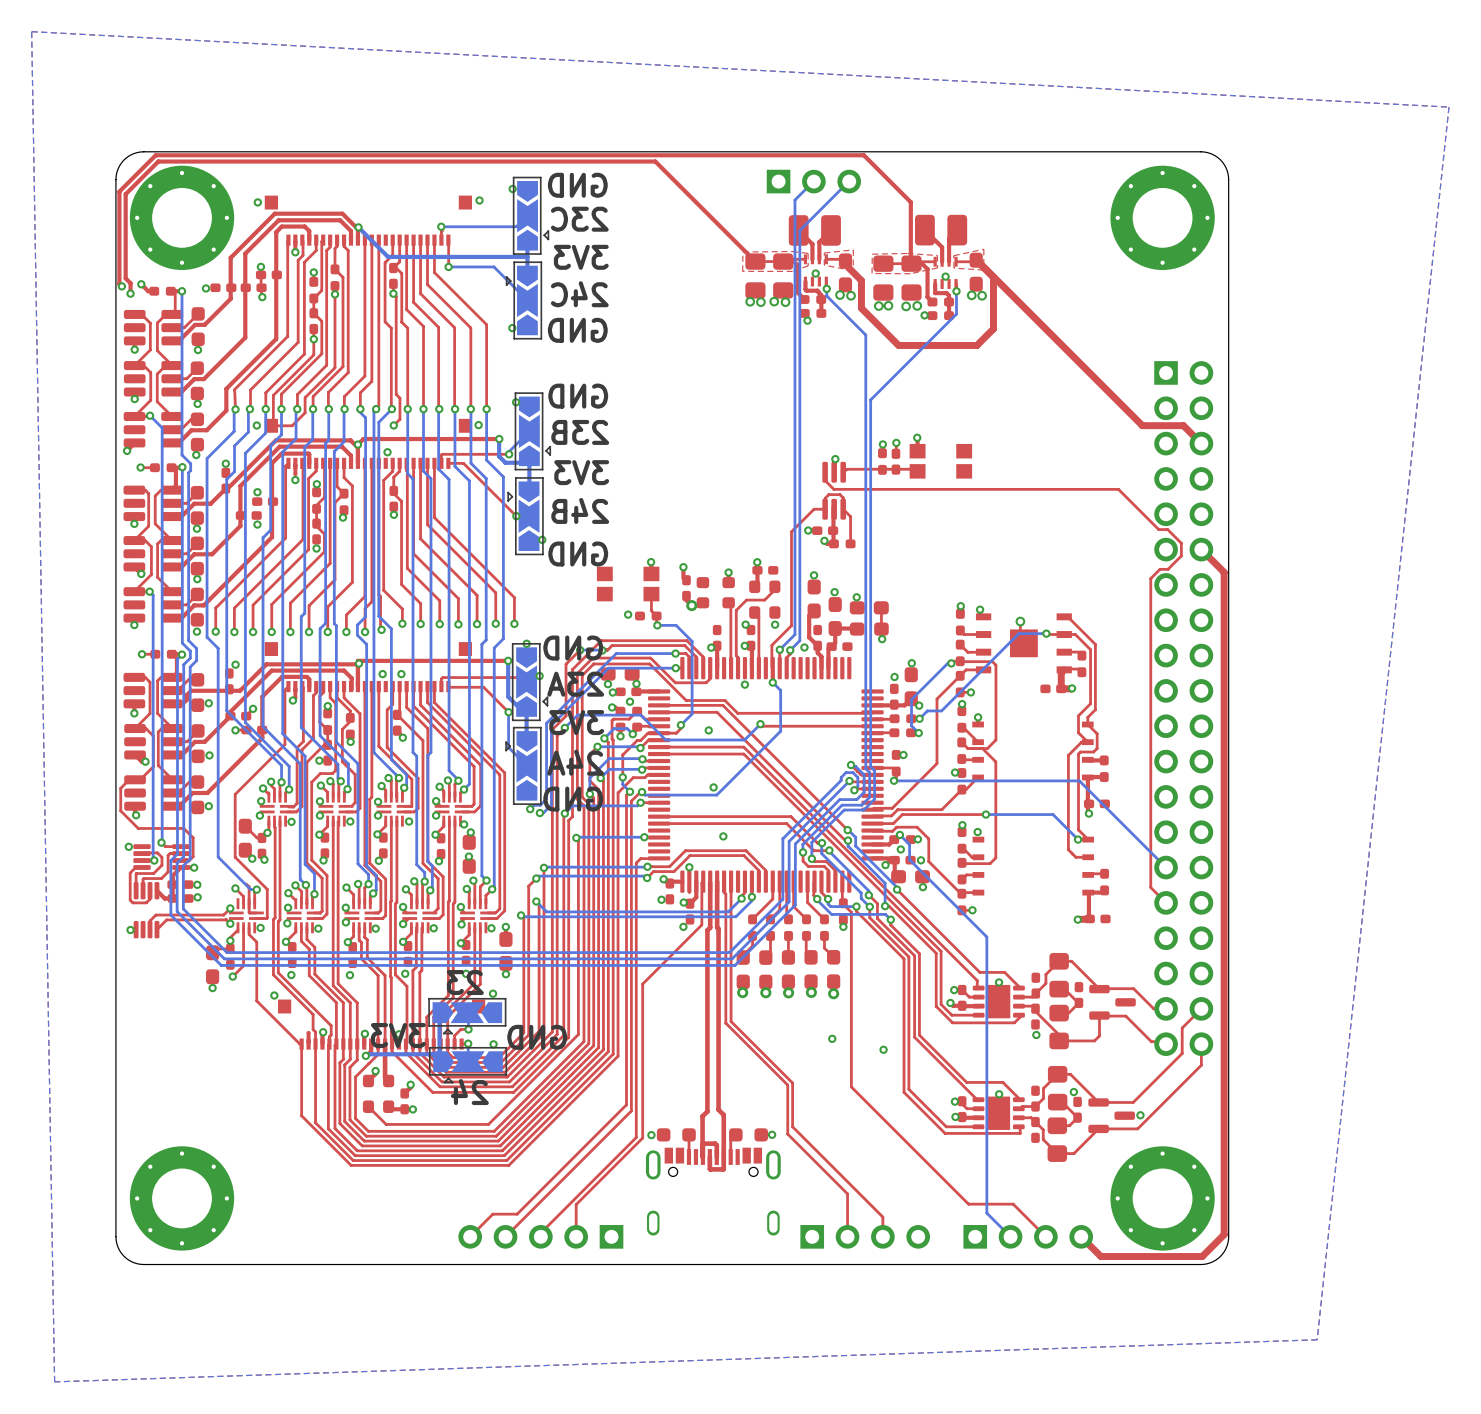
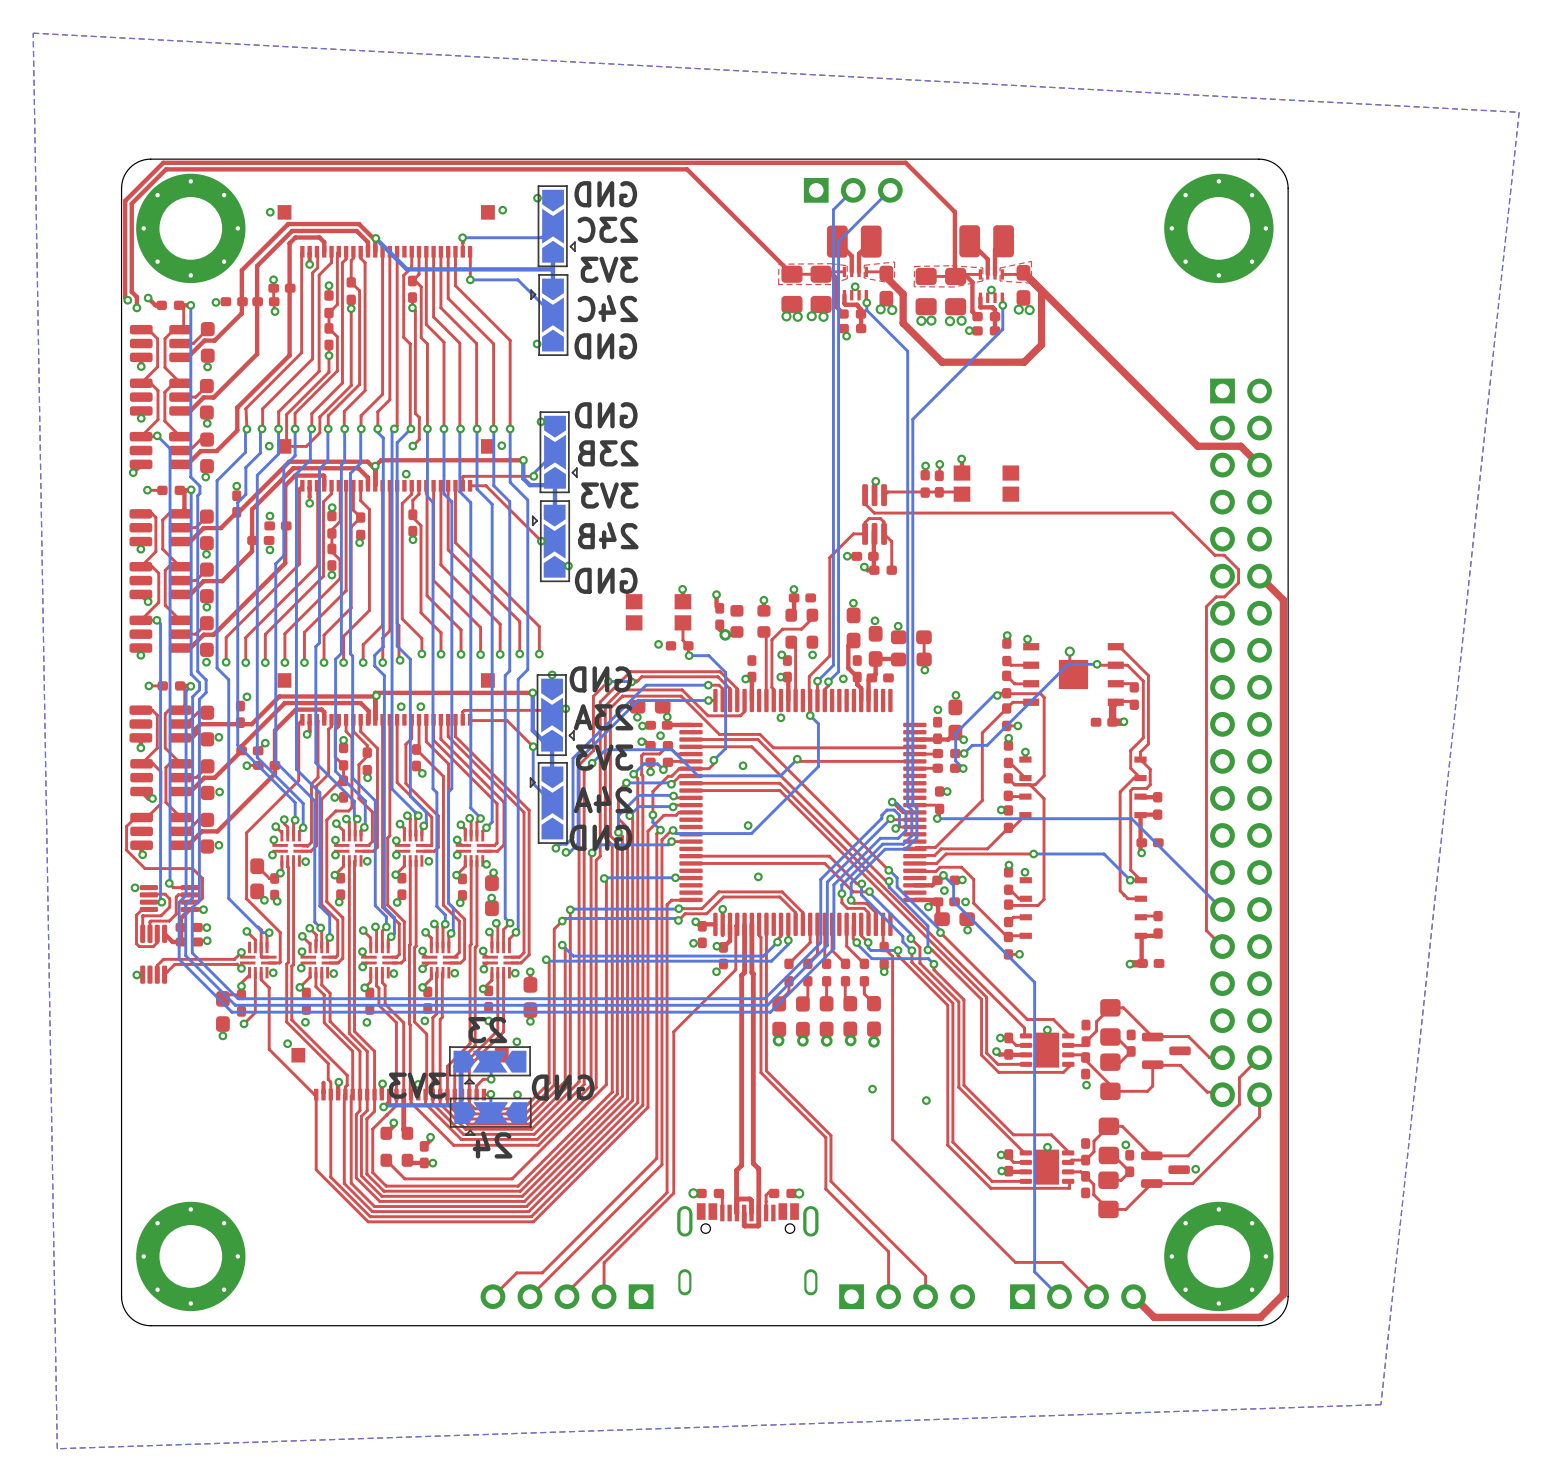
part footprint: [656, 1128, 696, 1142] -> [696, 1188, 725, 1199]
part footprint: [729, 1128, 768, 1142] -> [768, 1188, 797, 1199]
via: (772, 1134) -> none
via: (651, 1135) -> none
via: none -> (693, 1193)
via: none -> (799, 1193)

